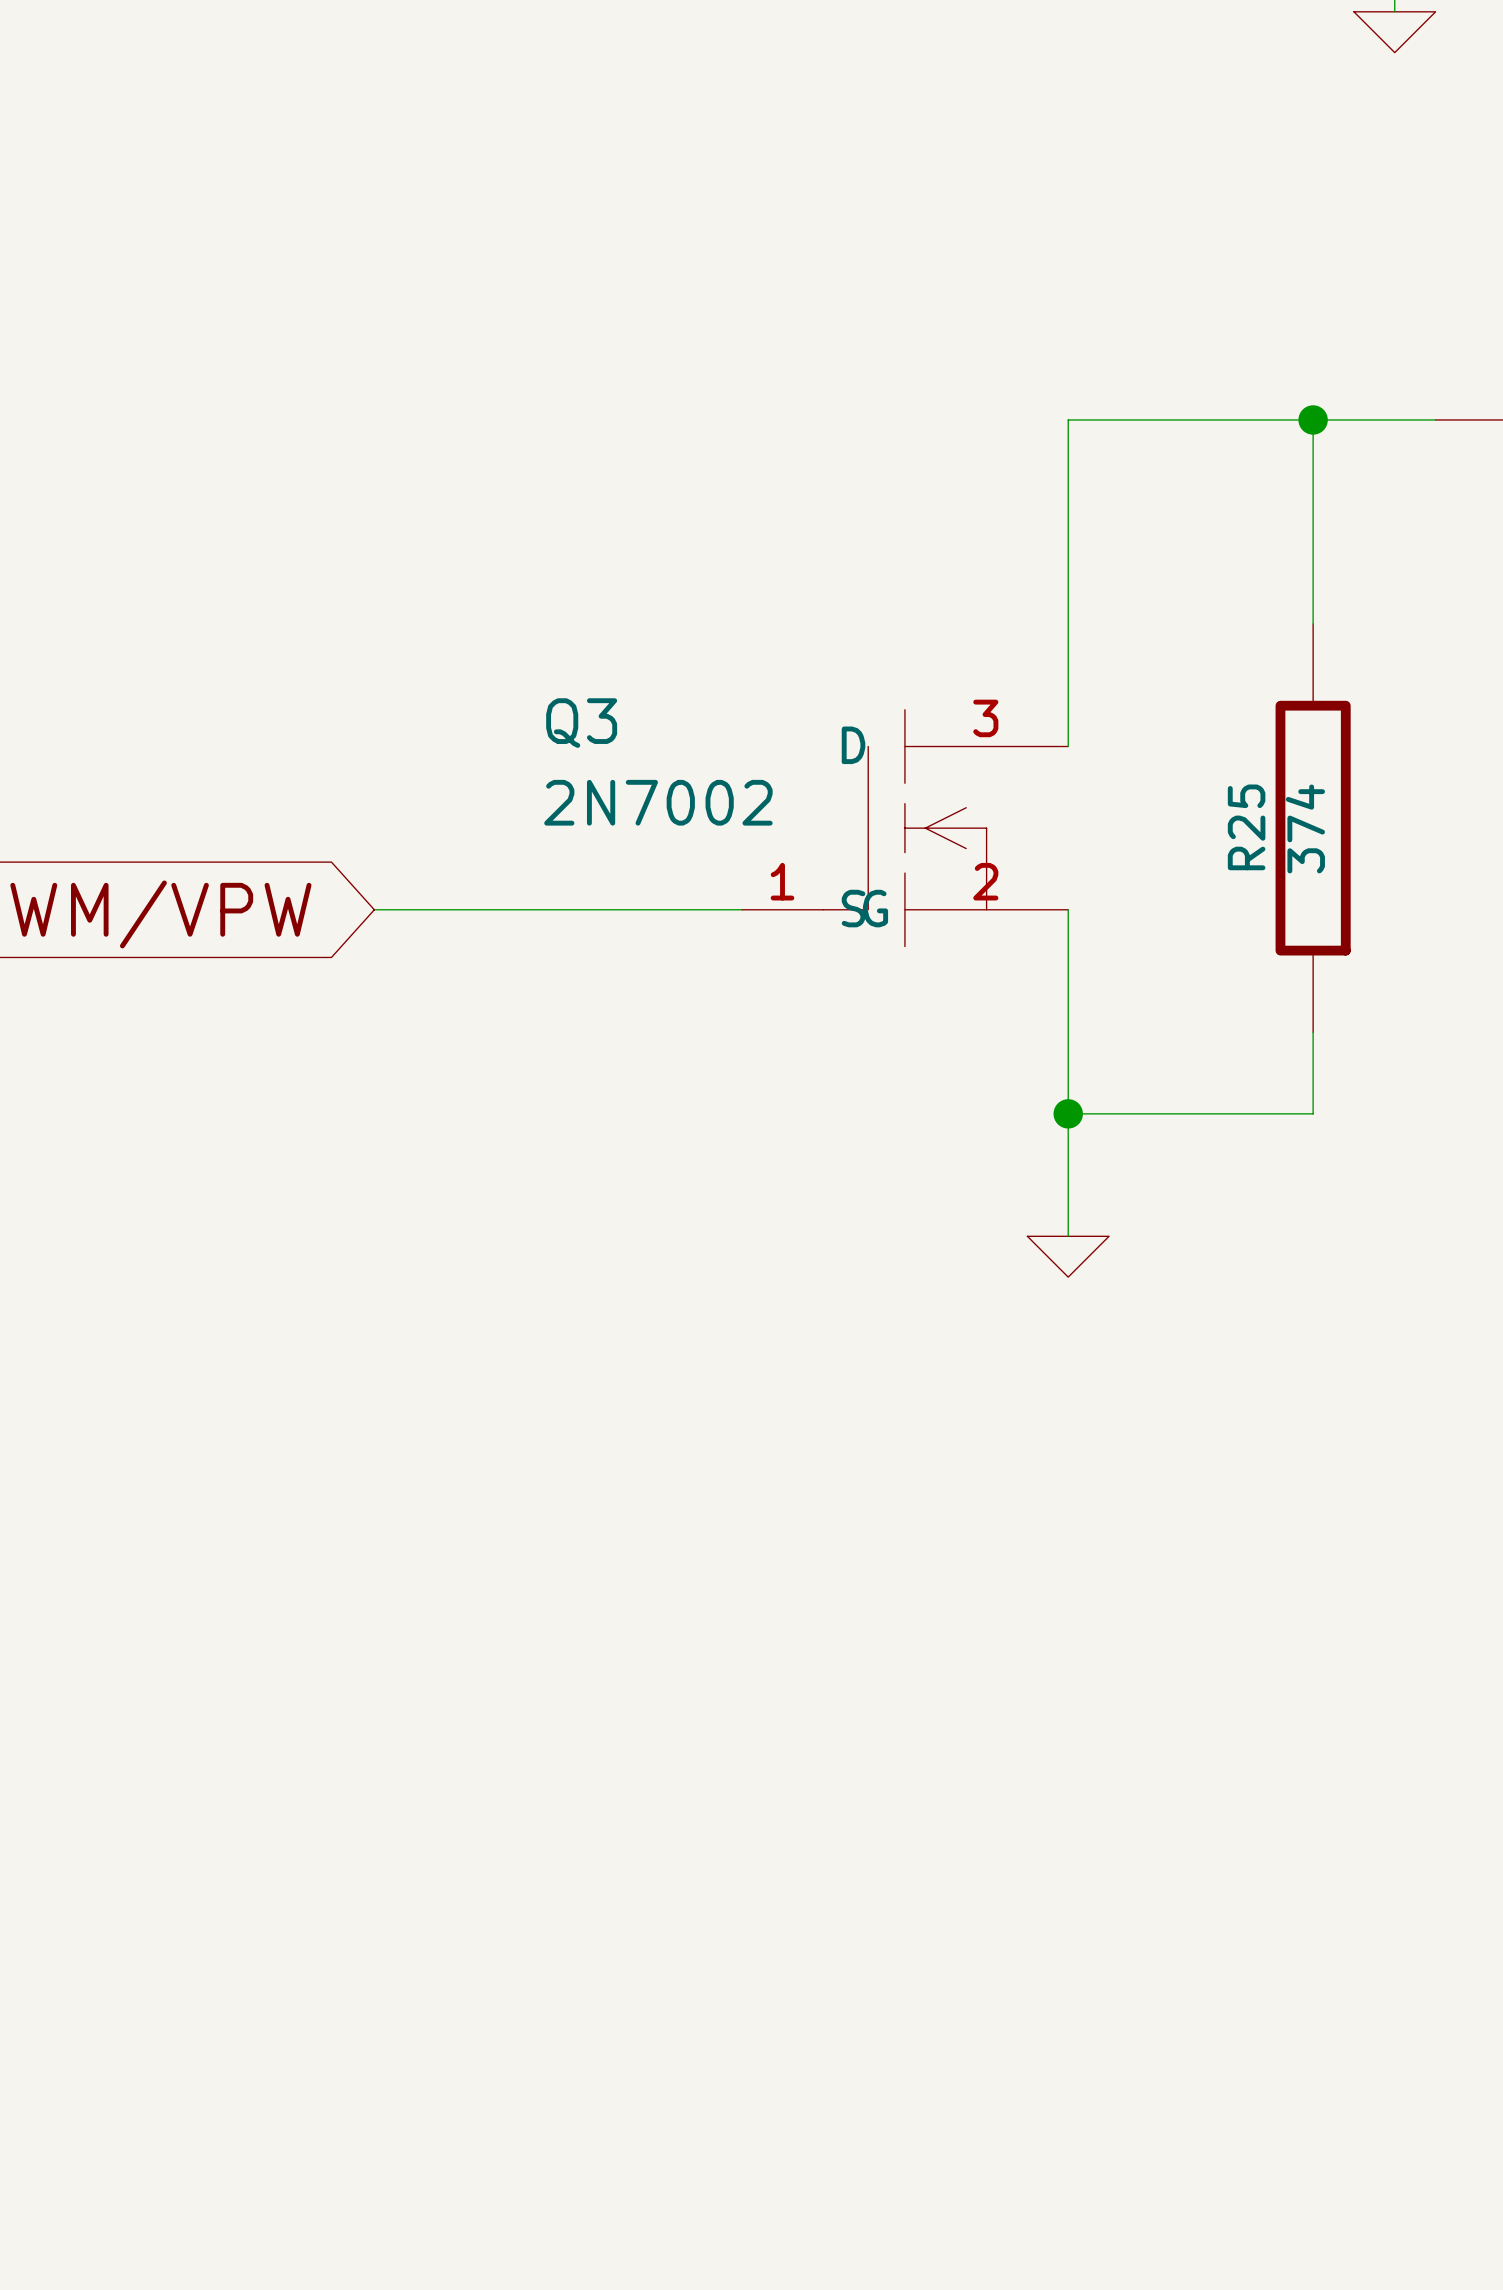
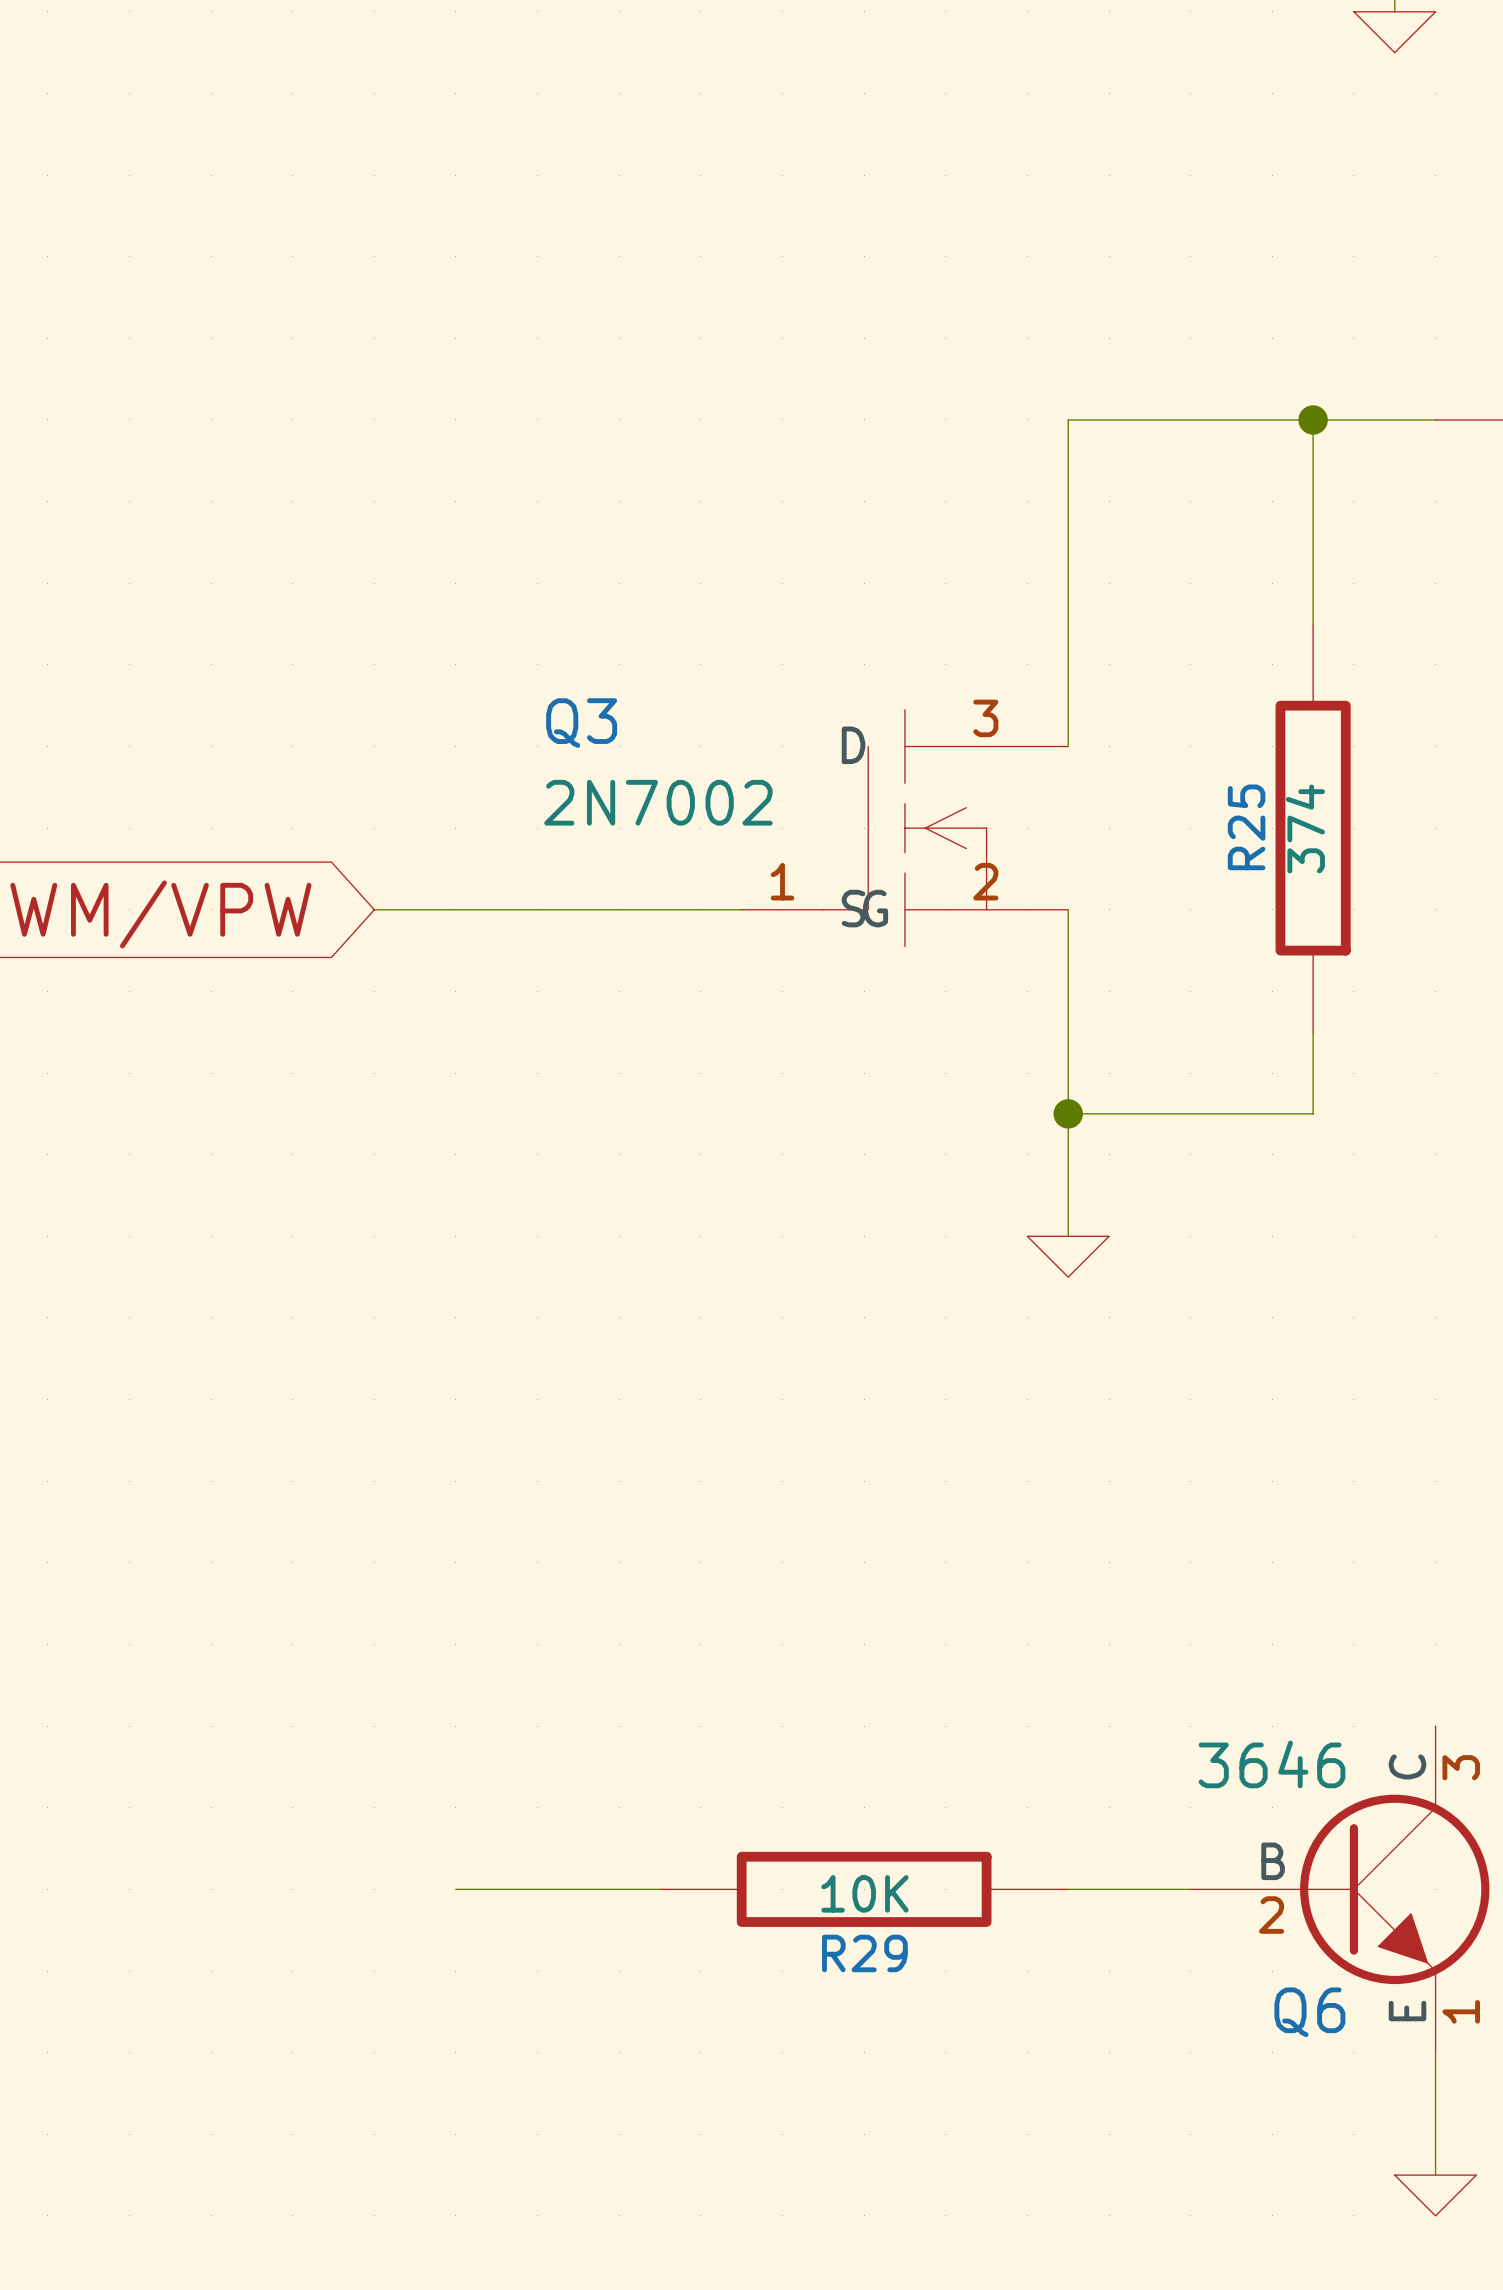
wire: none -> (455, 1889) (660, 1889)
R29: none -> 10K (864, 1889)
wire: none -> (1068, 1889) (1190, 1889)
Q6: none -> 3646 (1340, 1889)
wire: none -> (1435, 2052) (1435, 2175)
power symbol: none -> (1435, 2195)

